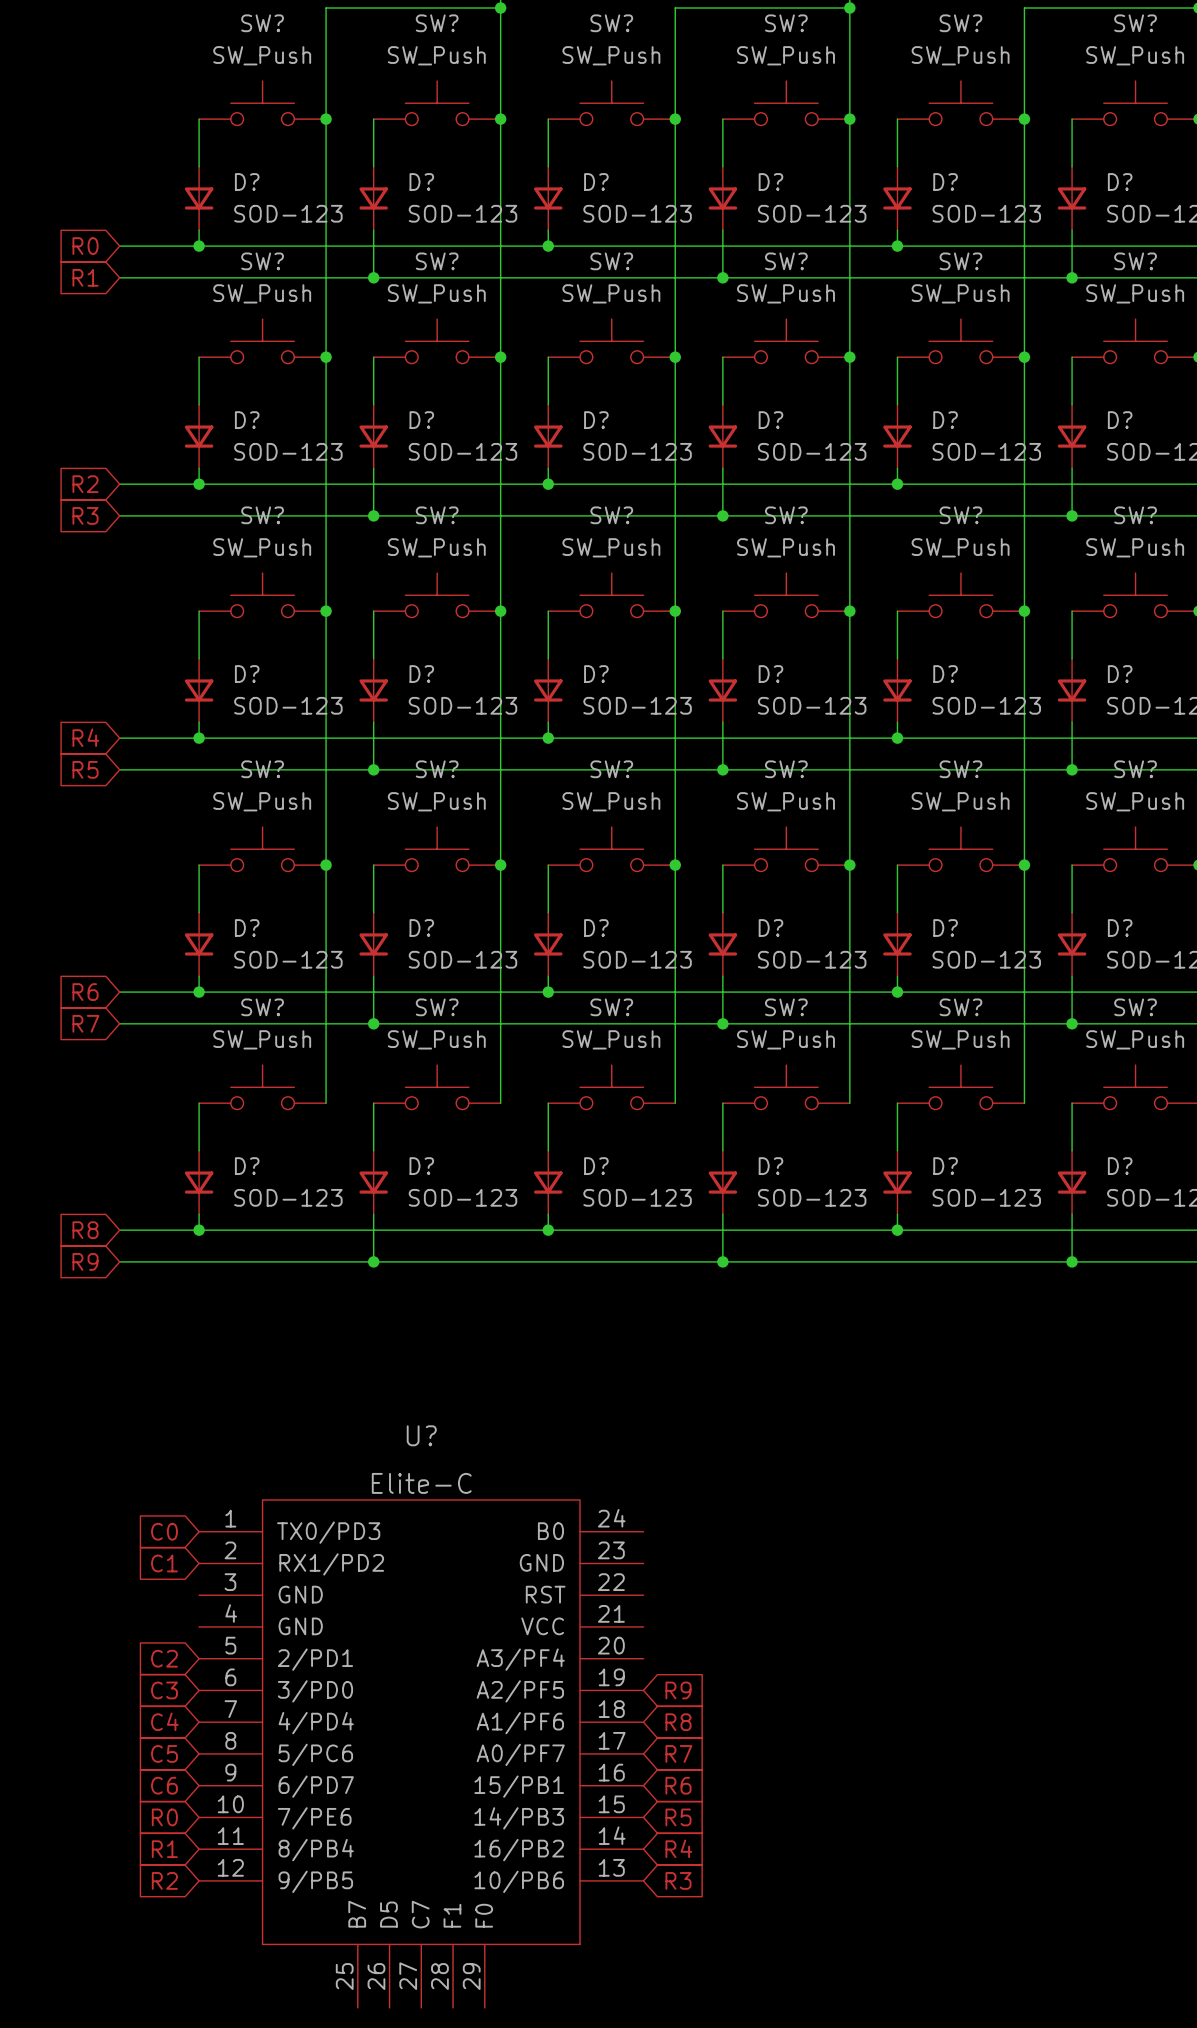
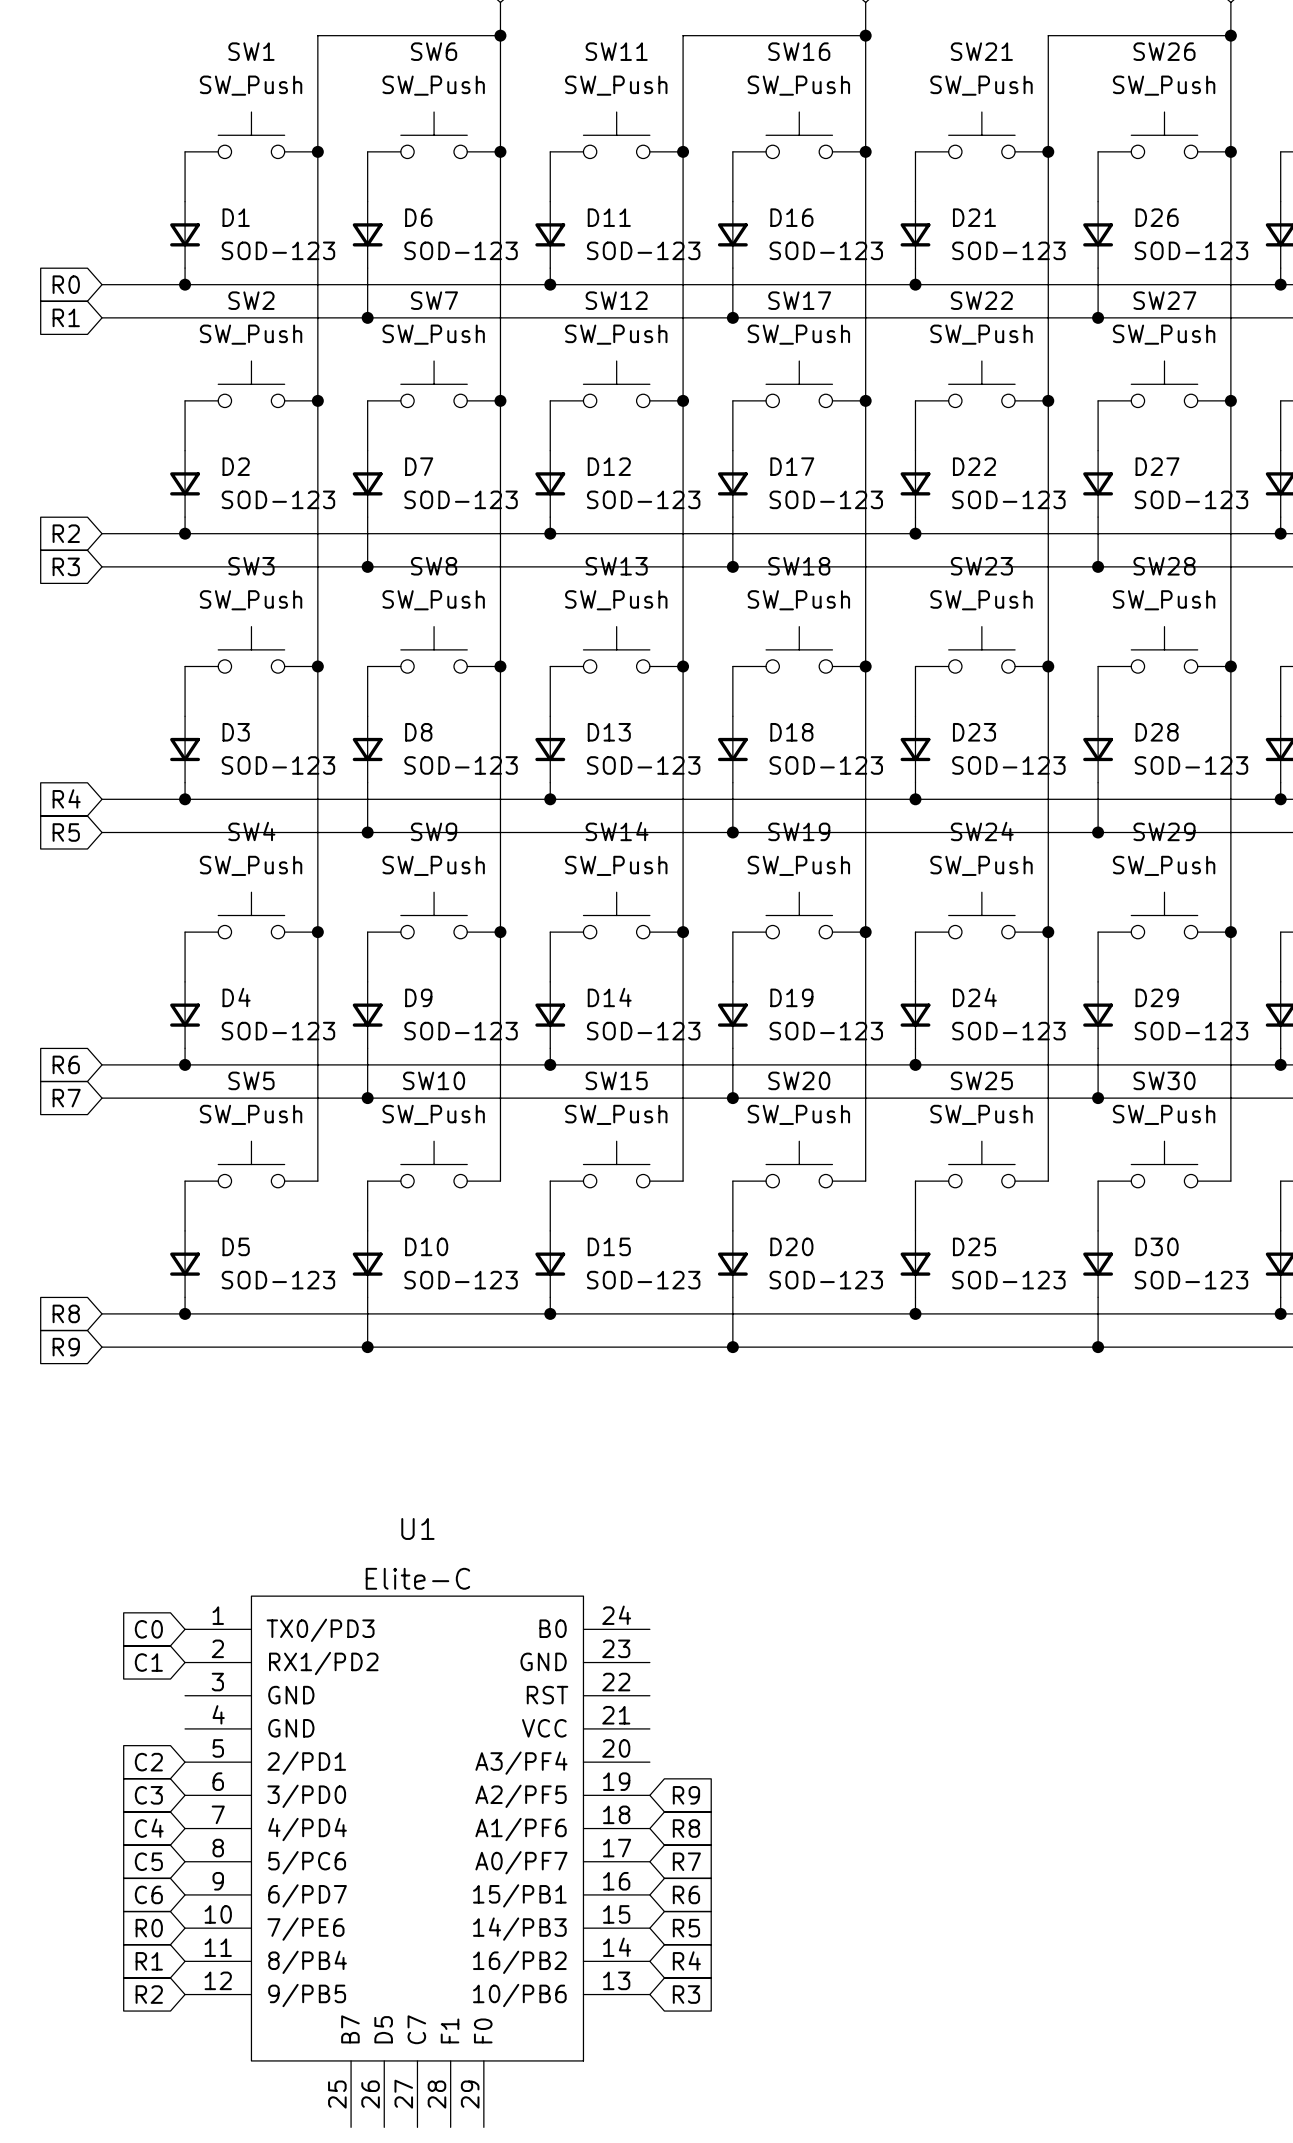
SW? name: SW? (262, 23) -> SW1 (251, 51)
SW? name: SW? (437, 23) -> SW6 (434, 51)
SW? name: SW? (611, 23) -> SW11 (616, 51)
SW? name: SW? (786, 23) -> SW16 (799, 51)
SW? name: SW? (960, 23) -> SW21 (981, 51)
SW? name: SW? (1135, 23) -> SW26 (1164, 51)
D? name: D? (247, 182) -> D1 (236, 217)
D? name: D? (421, 182) -> D6 (418, 217)
D? name: D? (596, 182) -> D11 (609, 217)
D? name: D? (770, 182) -> D16 (791, 217)
D? name: D? (945, 182) -> D21 (974, 217)
D? name: D? (1120, 182) -> D26 (1157, 217)
SW? name: SW? (262, 261) -> SW2 (251, 300)
SW? name: SW? (437, 261) -> SW7 (434, 300)
SW? name: SW? (611, 261) -> SW12 (616, 300)
SW? name: SW? (786, 261) -> SW17 (799, 300)
SW? name: SW? (960, 261) -> SW22 (981, 300)
SW? name: SW? (1135, 261) -> SW27 (1164, 300)
D? name: D? (247, 420) -> D2 (236, 466)
D? name: D? (421, 420) -> D7 (419, 466)
D? name: D? (596, 420) -> D12 (609, 466)
D? name: D? (770, 420) -> D17 (792, 466)
D? name: D? (945, 420) -> D22 (974, 466)
D? name: D? (1120, 420) -> D27 (1157, 466)
SW? name: SW? (262, 515) -> SW3 (251, 566)
SW? name: SW? (437, 515) -> SW8 (434, 566)
SW? name: SW? (611, 515) -> SW13 (616, 566)
SW? name: SW? (786, 515) -> SW18 (799, 566)
SW? name: SW? (960, 515) -> SW23 (981, 566)
SW? name: SW? (1135, 515) -> SW28 (1164, 566)
D? name: D? (247, 674) -> D3 (236, 732)
D? name: D? (421, 674) -> D8 (418, 732)
D? name: D? (596, 674) -> D13 (609, 732)
D? name: D? (770, 674) -> D18 (791, 732)
D? name: D? (945, 674) -> D23 (974, 732)
D? name: D? (1120, 674) -> D28 (1157, 732)
SW? name: SW? (262, 769) -> SW4 (251, 831)
SW? name: SW? (437, 769) -> SW9 (434, 831)
SW? name: SW? (611, 769) -> SW14 (617, 831)
SW? name: SW? (786, 769) -> SW19 (799, 831)
SW? name: SW? (960, 769) -> SW24 (982, 831)
SW? name: SW? (1135, 769) -> SW29 (1164, 831)
D? name: D? (247, 928) -> D4 (236, 997)
D? name: D? (421, 928) -> D9 (418, 997)
D? name: D? (596, 928) -> D14 (609, 997)
D? name: D? (770, 928) -> D19 (791, 997)
D? name: D? (945, 928) -> D24 (974, 997)
D? name: D? (1120, 928) -> D29 (1157, 997)
SW? name: SW? (262, 1007) -> SW5 (251, 1080)
SW? name: SW? (437, 1007) -> SW10 (434, 1080)
SW? name: SW? (611, 1007) -> SW15 (616, 1080)
SW? name: SW? (786, 1007) -> SW20 (799, 1080)
SW? name: SW? (960, 1007) -> SW25 (981, 1080)
SW? name: SW? (1135, 1007) -> SW30 (1164, 1080)
D? name: D? (247, 1166) -> D5 (236, 1246)
D? name: D? (421, 1166) -> D10 (426, 1246)
D? name: D? (596, 1166) -> D15 (609, 1246)
D? name: D? (770, 1166) -> D20 (791, 1246)
D? name: D? (945, 1166) -> D25 (974, 1246)
D? name: D? (1120, 1166) -> D30 (1157, 1246)
U? name: U? (421, 1435) -> U1 (417, 1528)

